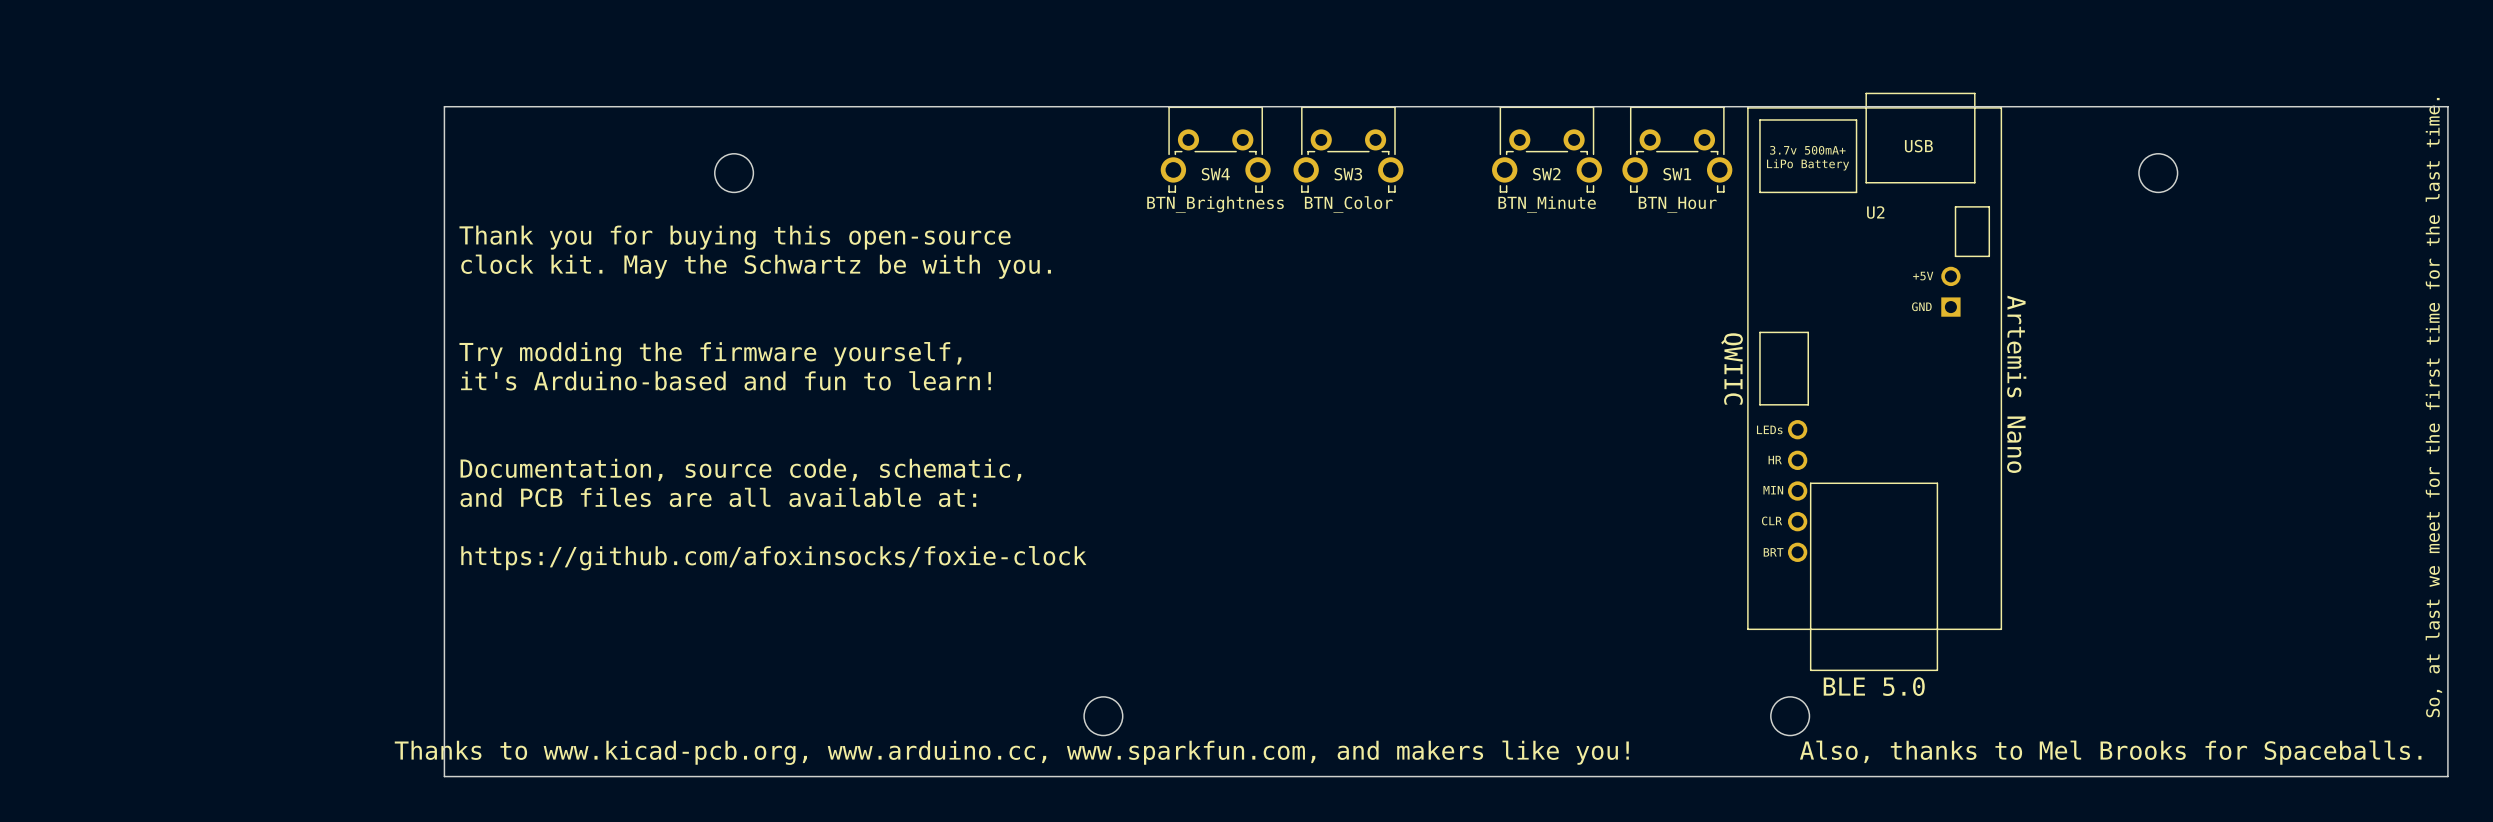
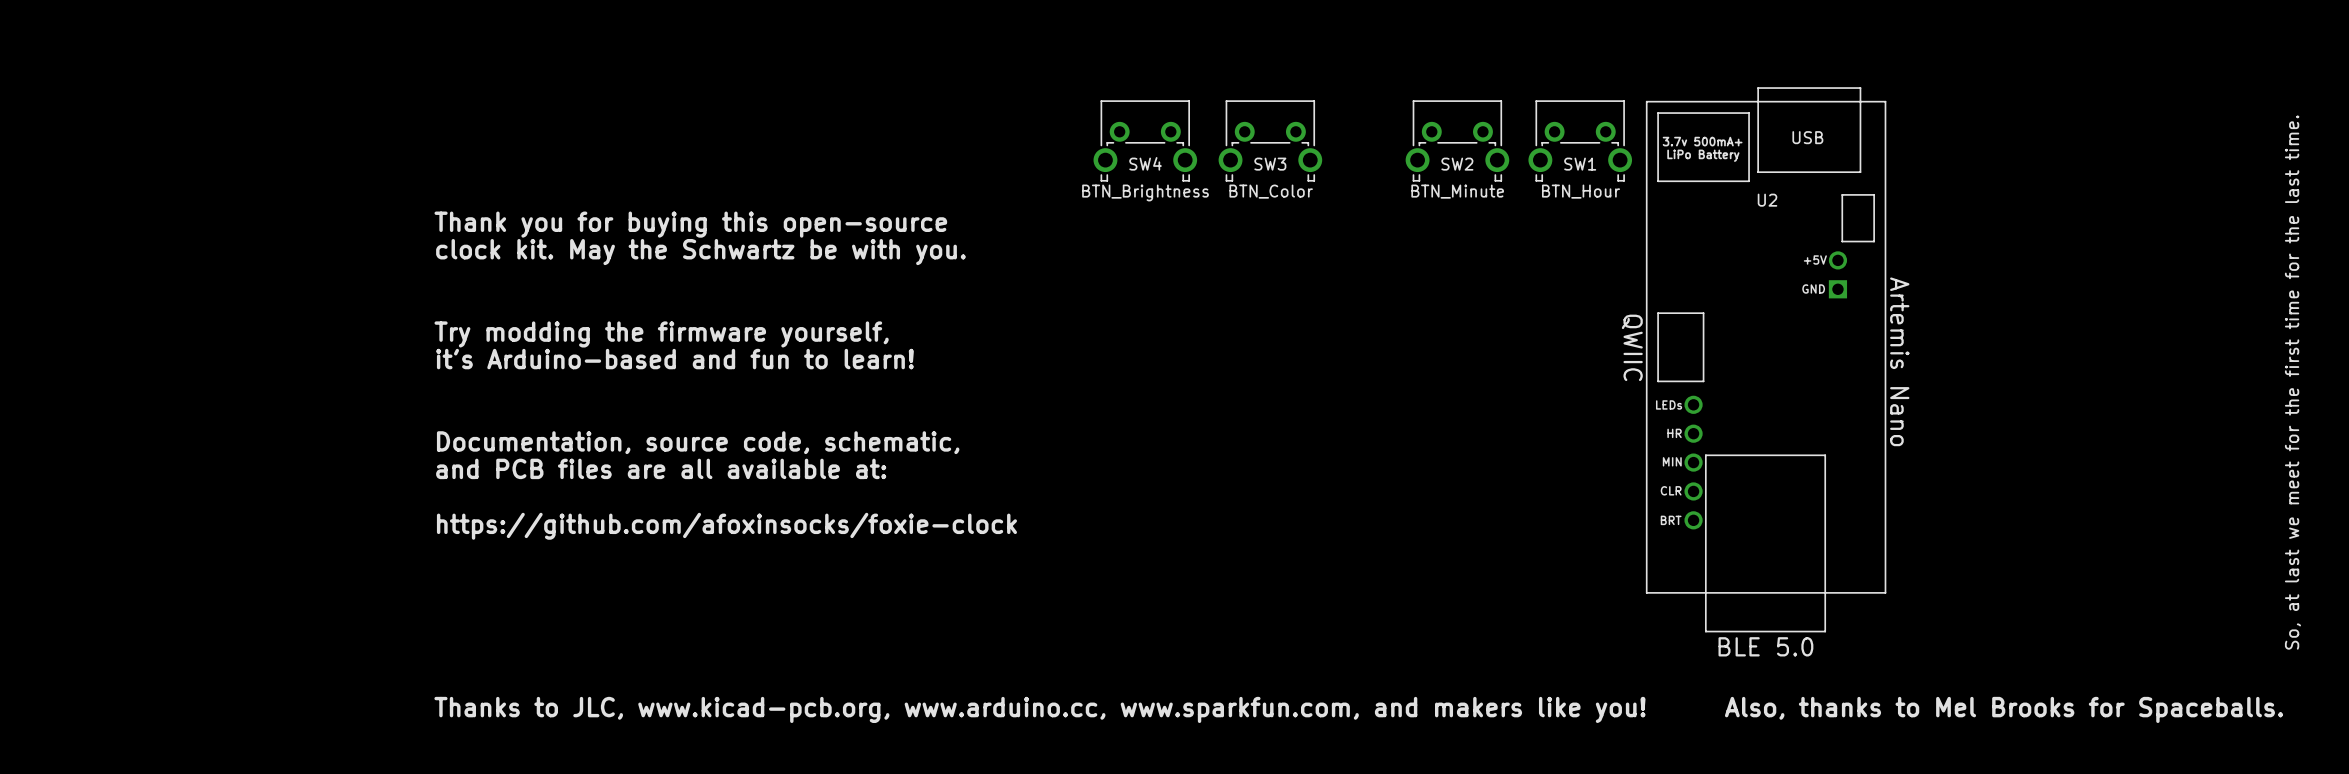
board edge: (2447, 106) (444, 106) (444, 776) (2447, 776) (2447, 106) -> none
round board edge: [714, 153, 754, 193] -> none
round board edge: [2138, 153, 2178, 193] -> none
round board edge: [1083, 696, 1124, 736] -> none
round board edge: [1770, 696, 1810, 736] -> none
text: Thanks to www.kicad-pcb.org, www.arduino.cc, www.sparkfun.com, and makers like you! Also, thanks to Mel Brooks for Spaceballs. (1408, 752) -> Thanks to JLC, www.kicad-pcb.org, www.arduino.cc, www.sparkfun.com, and makers like you! Also, thanks to Mel Brooks for Spaceballs. (1358, 709)

